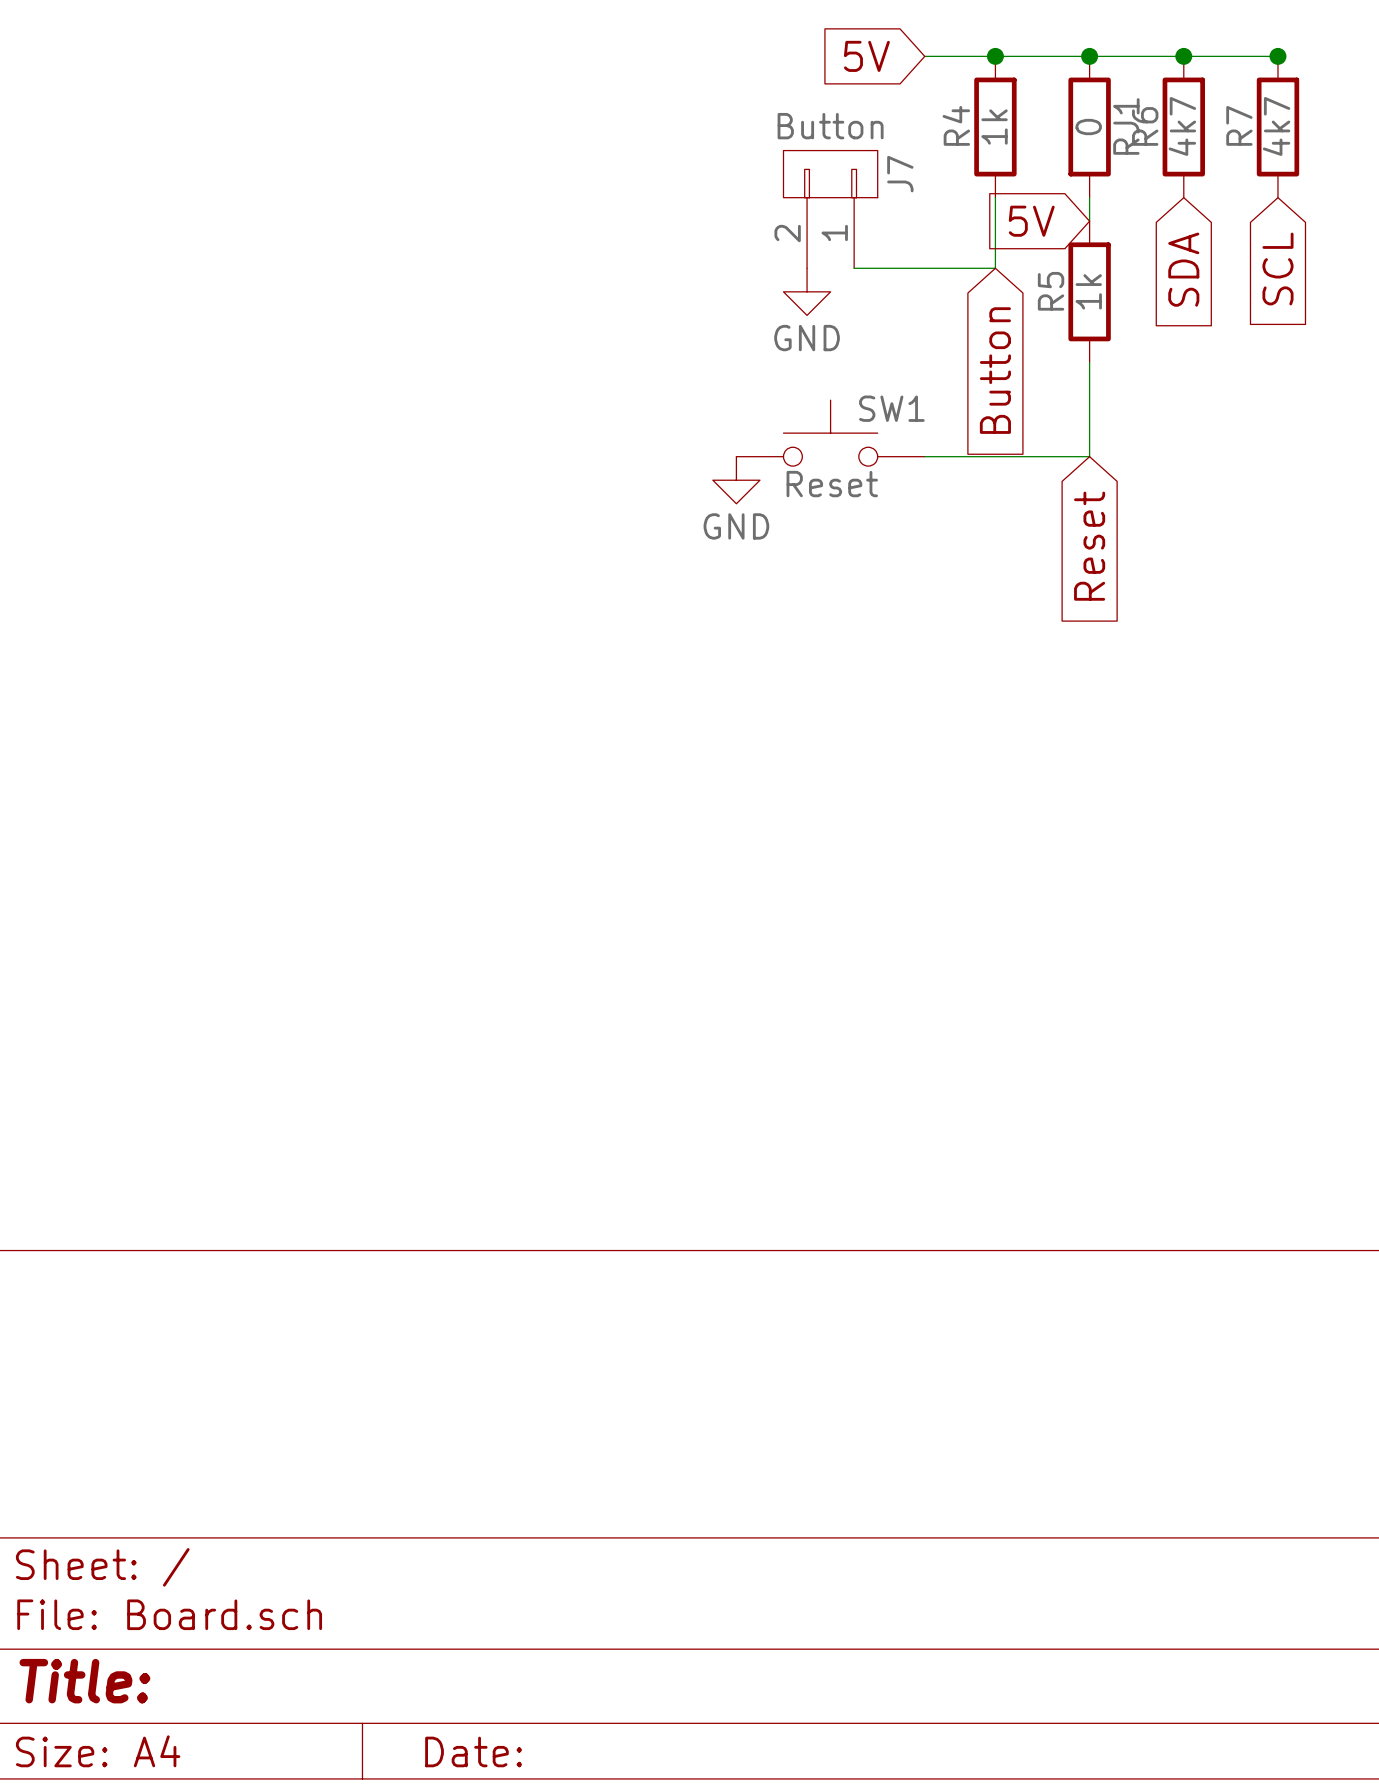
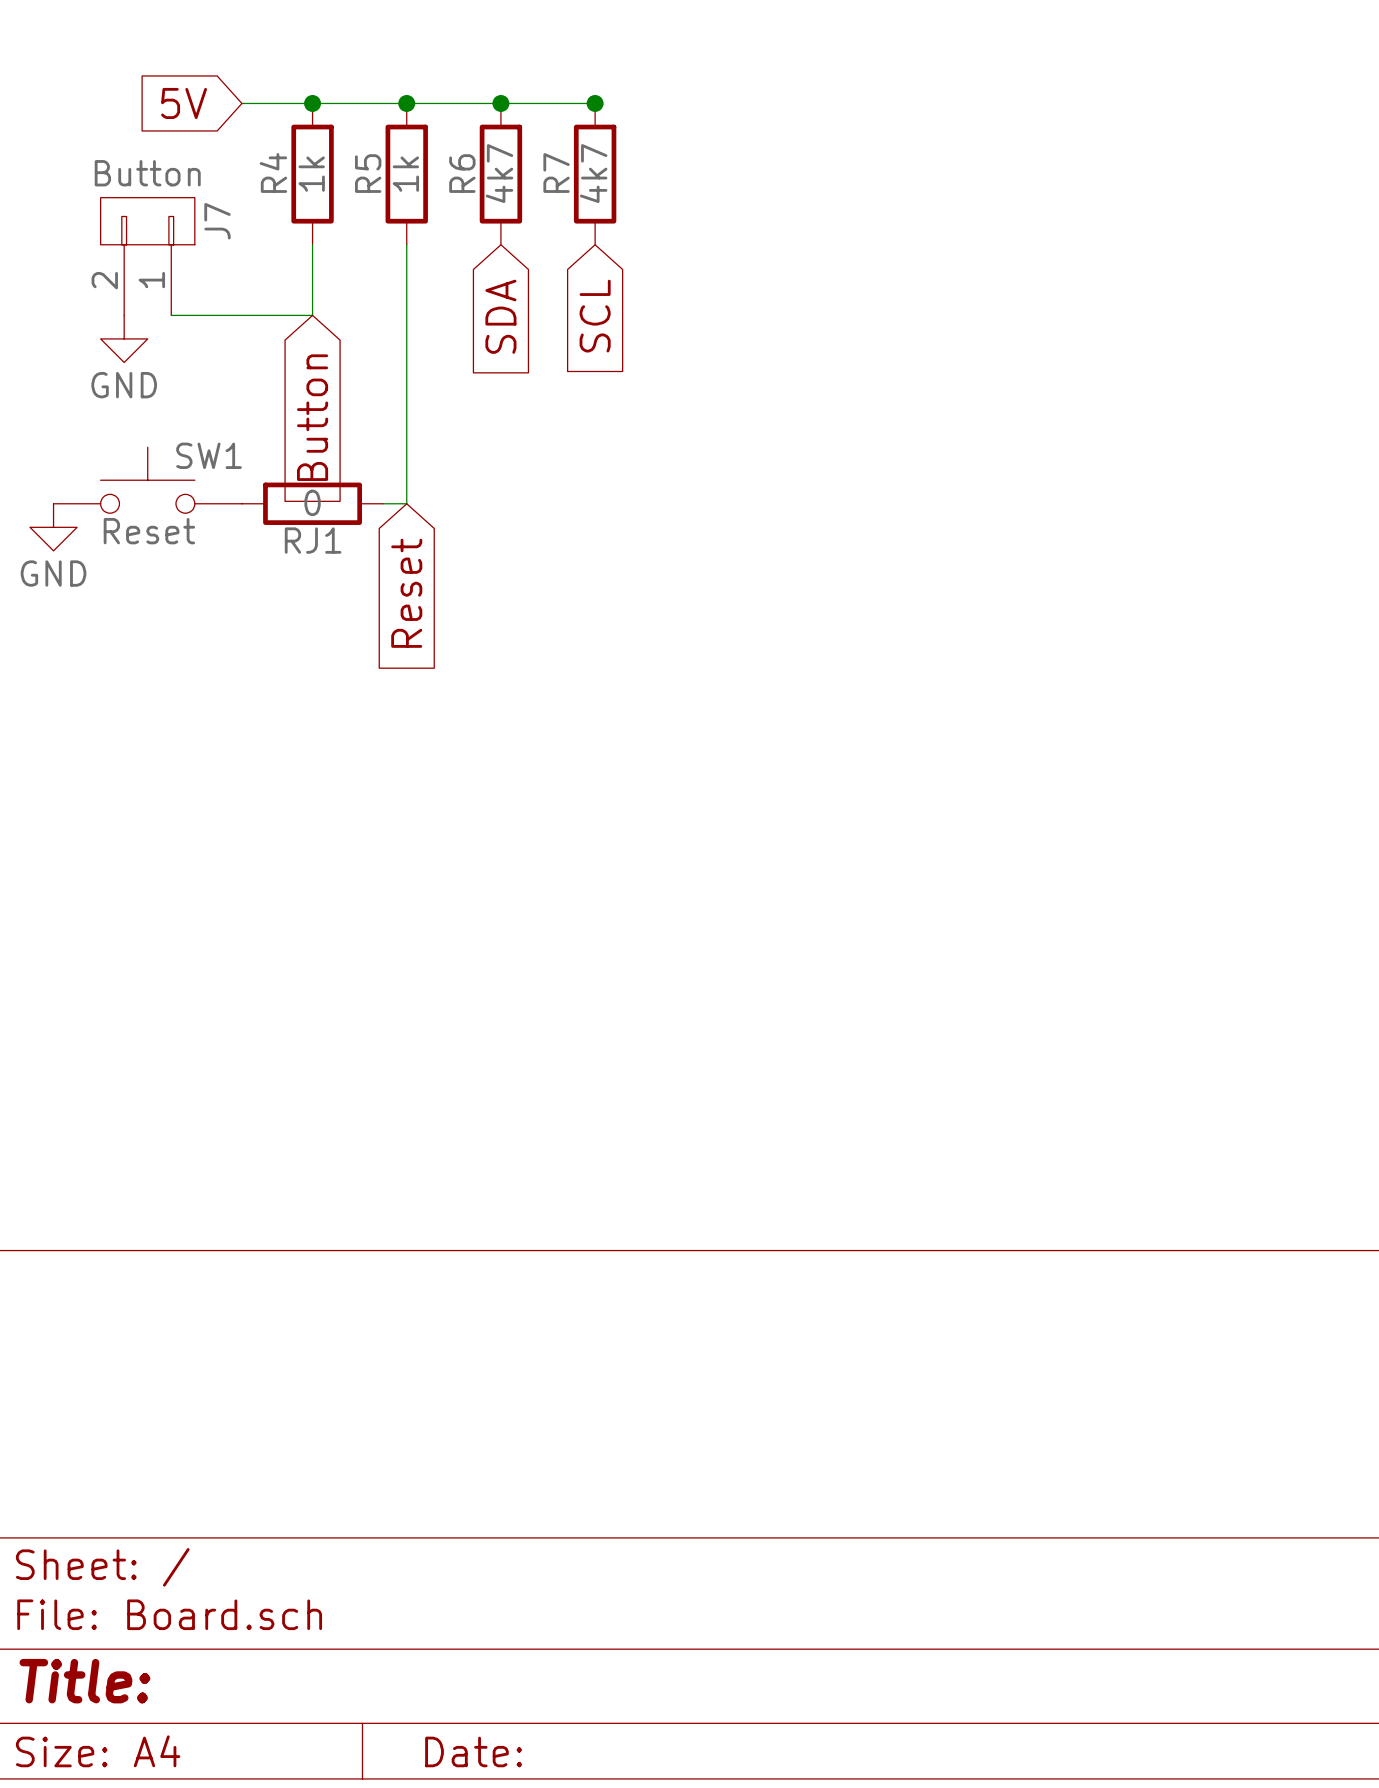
global label: 5V (866, 56) -> none
wire: (924, 56) (1277, 56) -> none
junction: (995, 56) -> none
junction: (1089, 56) -> none
junction: (1183, 56) -> none
junction: (1277, 56) -> none
global label: none -> 5V (184, 103)
wire: none -> (241, 103) (595, 103)
junction: none -> (312, 103)
junction: none -> (406, 103)
junction: none -> (500, 103)
junction: none -> (595, 103)
R4 position: (995, 127) -> (312, 174)
RJ1 rotation: 0° (1089, 127) -> 90° clockwise (312, 503)
RJ1 position: (1089, 127) -> (312, 503)
R6 position: (1183, 127) -> (500, 174)
R7 position: (1277, 127) -> (595, 174)
wire: (995, 197) (995, 268) (854, 268) -> none
wire: (1089, 197) (1089, 221) -> none
J7 position: (830, 209) -> (147, 256)
global label: 5V (1031, 221) -> none
wire: none -> (312, 244) (312, 315) (171, 315)
wire: none -> (406, 244) (406, 503) (383, 503)
global label: SCL (1277, 268) -> none
global label: SDA (1183, 269) -> none
power symbol: GND (807, 291) -> none
R5 position: (1089, 291) -> (406, 174)
global label: none -> SDA (500, 316)
global label: none -> SCL (595, 316)
power symbol: none -> GND (124, 338)
wire: (1089, 362) (1089, 456) (924, 456) -> none
global label: Button (995, 370) -> none
global label: none -> Button (312, 417)
SW1 position: (830, 433) -> (147, 480)
power symbol: GND (736, 480) -> none
power symbol: none -> GND (53, 527)
global label: Reset (1089, 546) -> none
global label: none -> Reset (406, 593)

